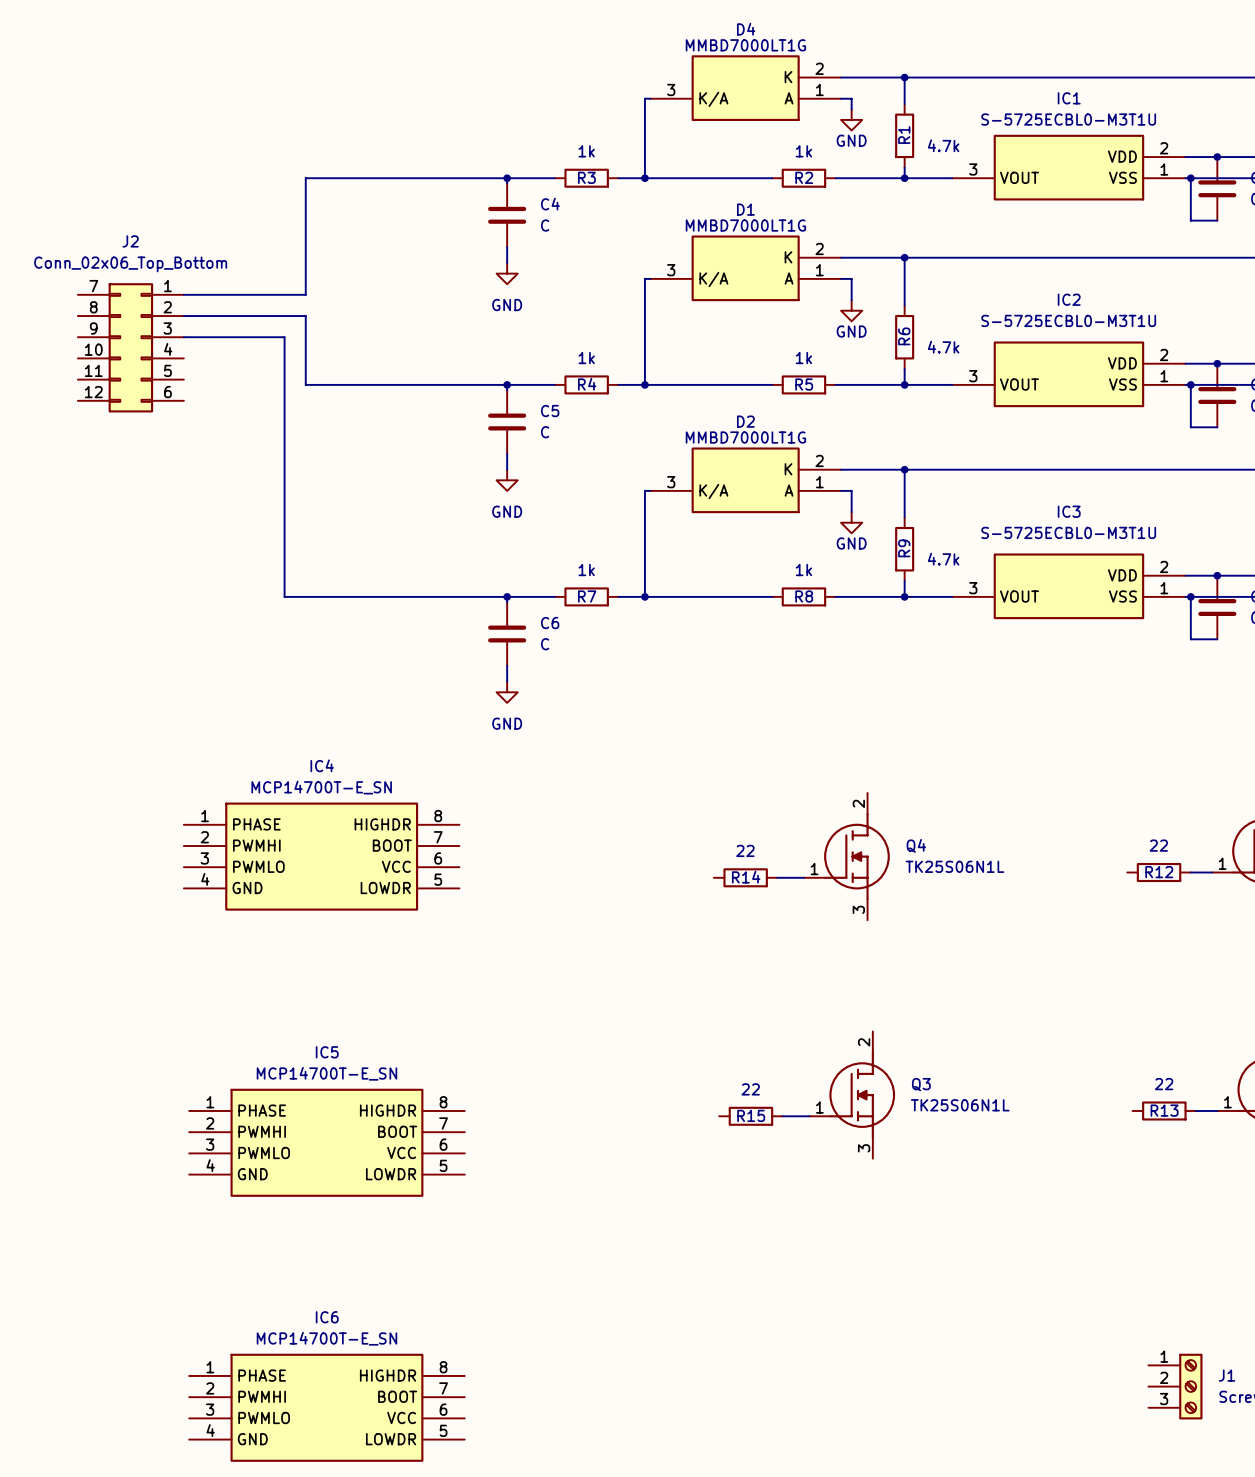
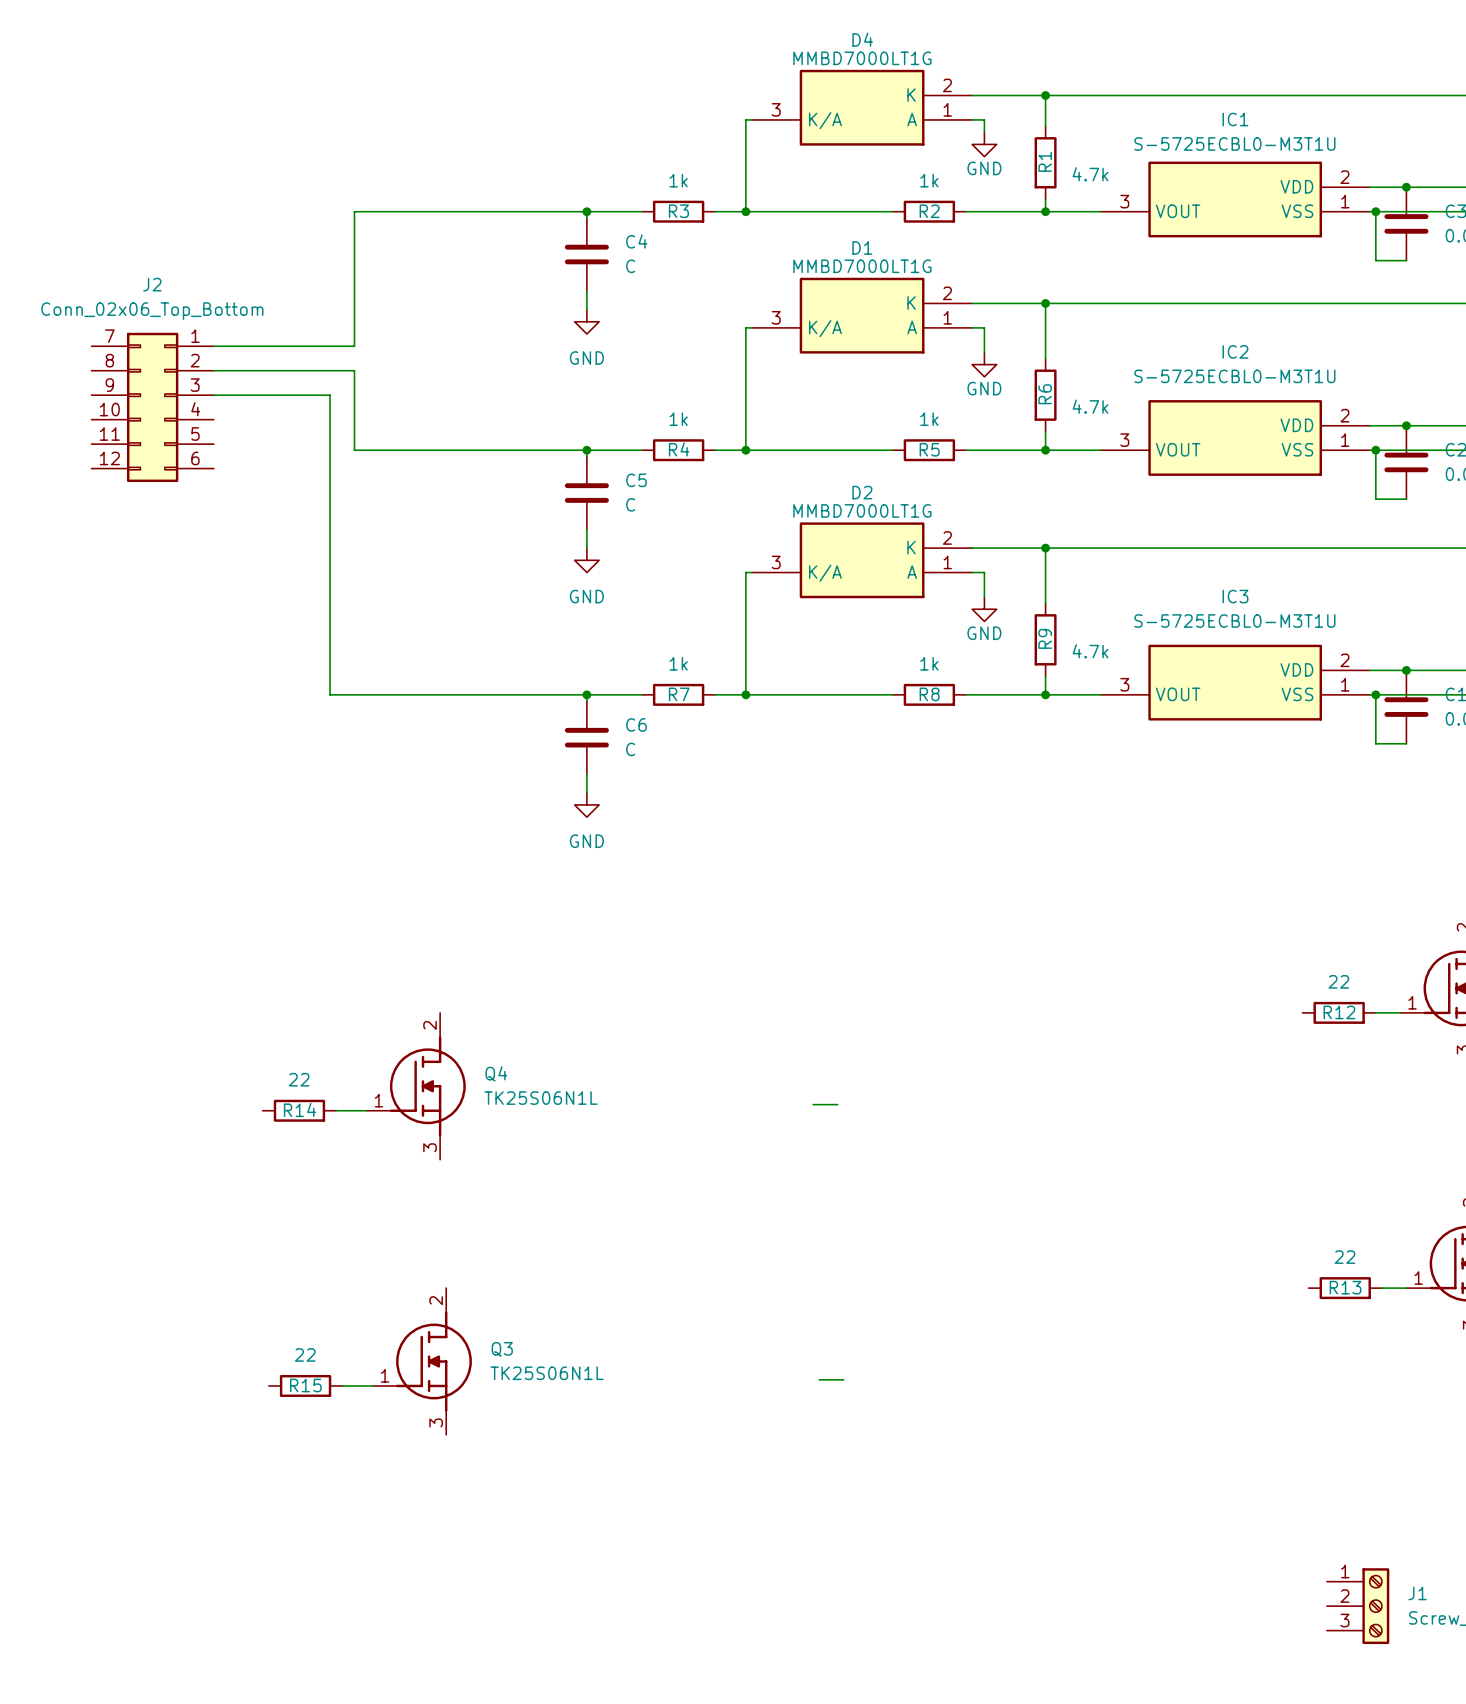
IC4: MCP14700T-E_SN (321, 856) -> none
Q4 position: (846, 856) -> (416, 1086)
R14 position: (745, 877) -> (299, 1110)
wire: (777, 877) (803, 877) -> none
wire: none -> (813, 1104) (837, 1104)
wire: none -> (336, 1110) (366, 1110)
Q3 position: (852, 1095) -> (422, 1361)
R15 position: (750, 1116) -> (305, 1385)
wire: (782, 1116) (809, 1116) -> none
IC5: MCP14700T-E_SN (326, 1142) -> none
wire: none -> (819, 1379) (843, 1379)
IC6: MCP14700T-E_SN (326, 1407) -> none

